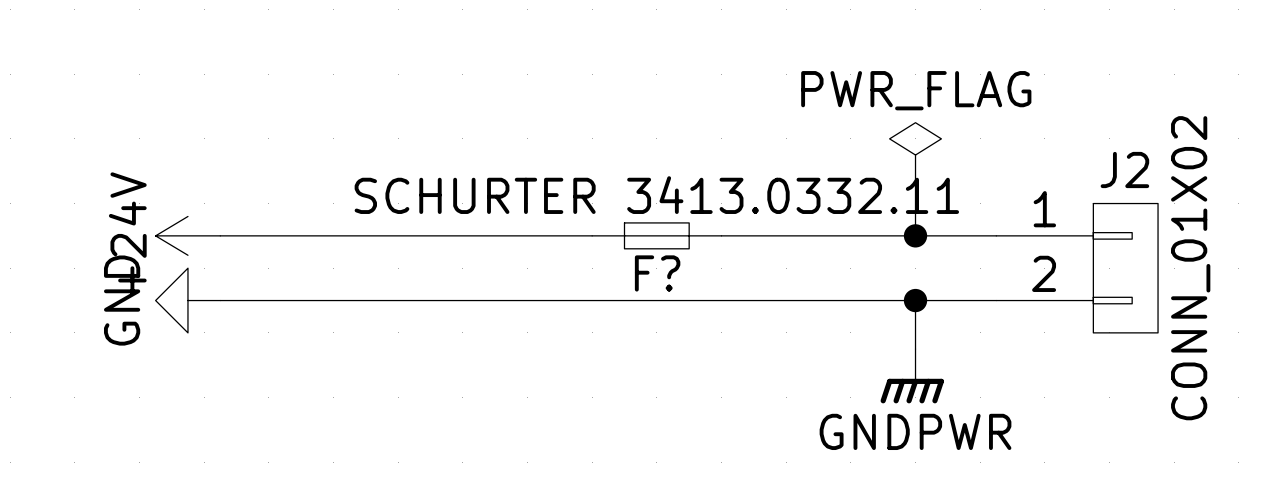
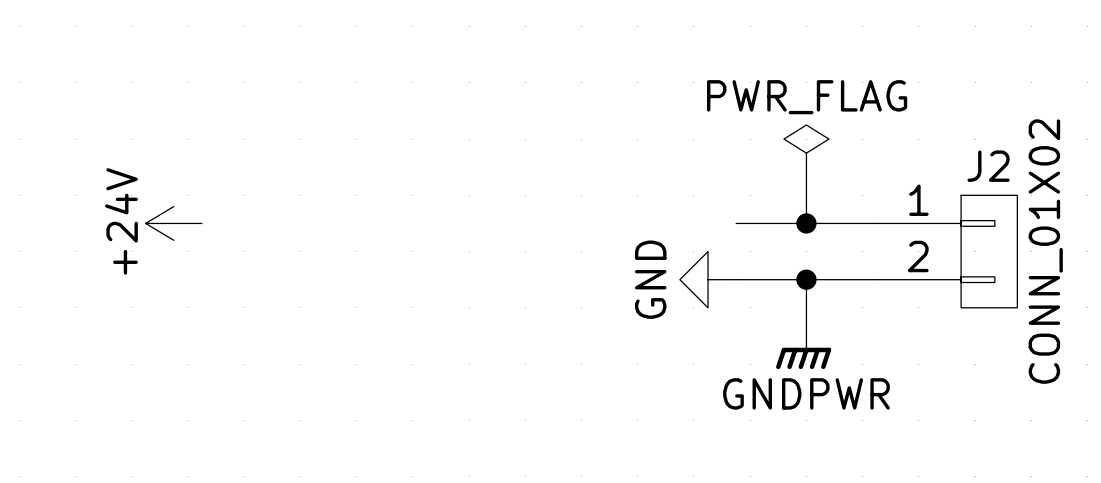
wire: (220, 235) (592, 235) -> none
F?: SCHURTER 3413.0332.11 (656, 235) -> none
wire: (721, 235) (834, 235) -> none
power symbol position: GND (187, 300) -> GND (708, 279)
wire: (220, 300) (834, 300) -> none

